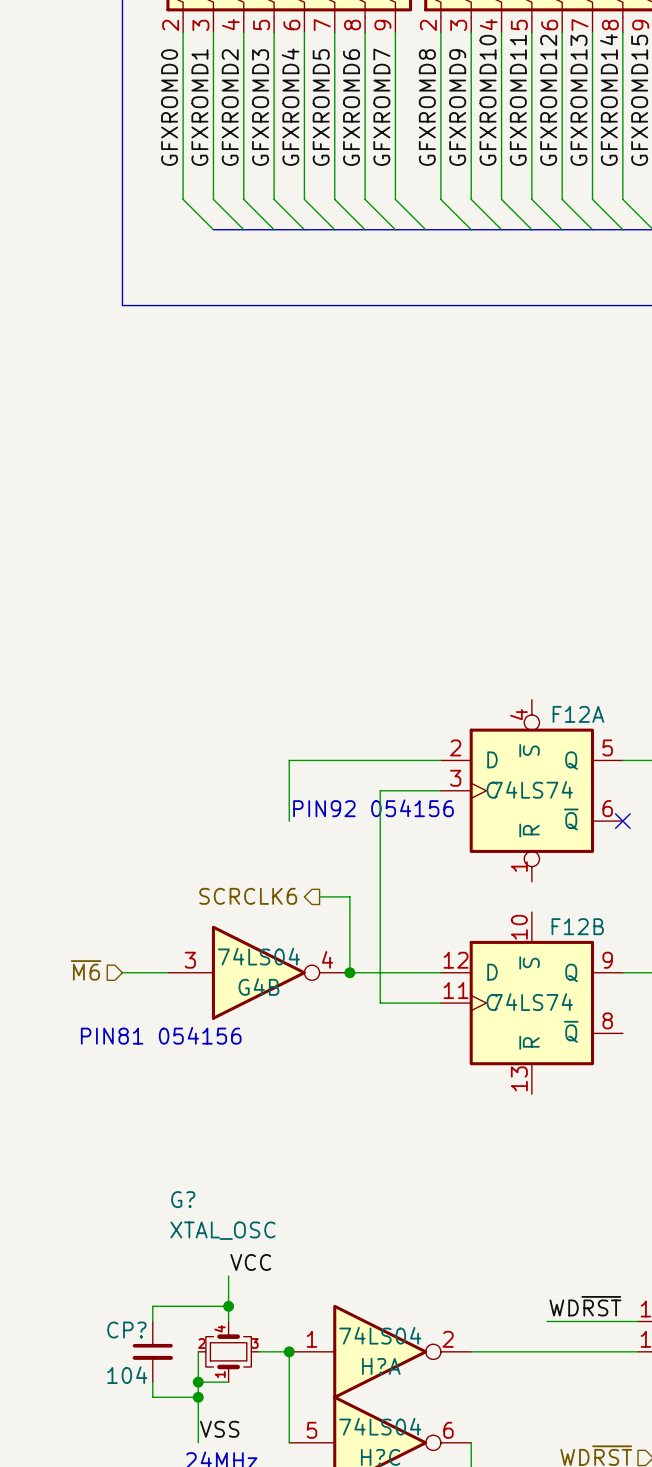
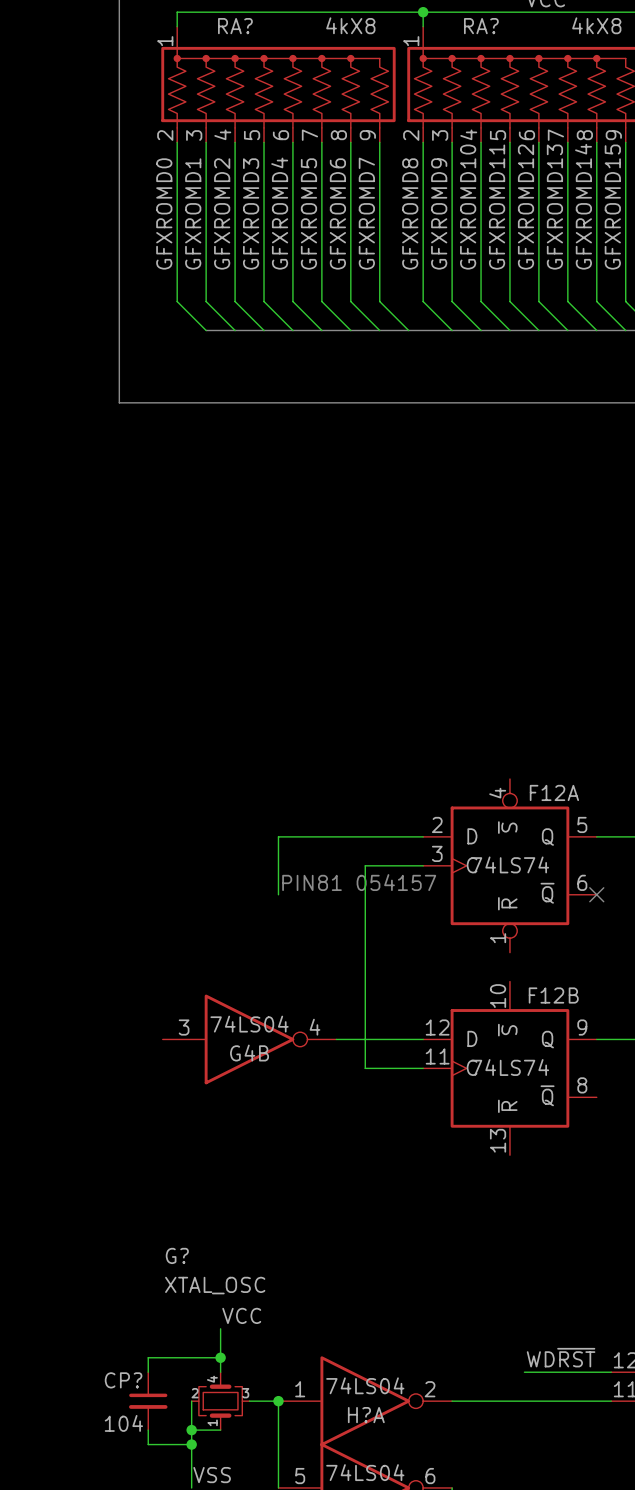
text: PIN92 054156 (373, 808) -> PIN81 054157 (359, 882)
hierarchical label: SCRCLK6 (248, 896) -> none
wire: (319, 896) (349, 896) (349, 972) -> none
hierarchical label: ~{M6} (86, 970) -> none
wire: (122, 972) (167, 972) -> none
junction: (349, 972) -> none
text: PIN81 054156 (161, 1035) -> none

